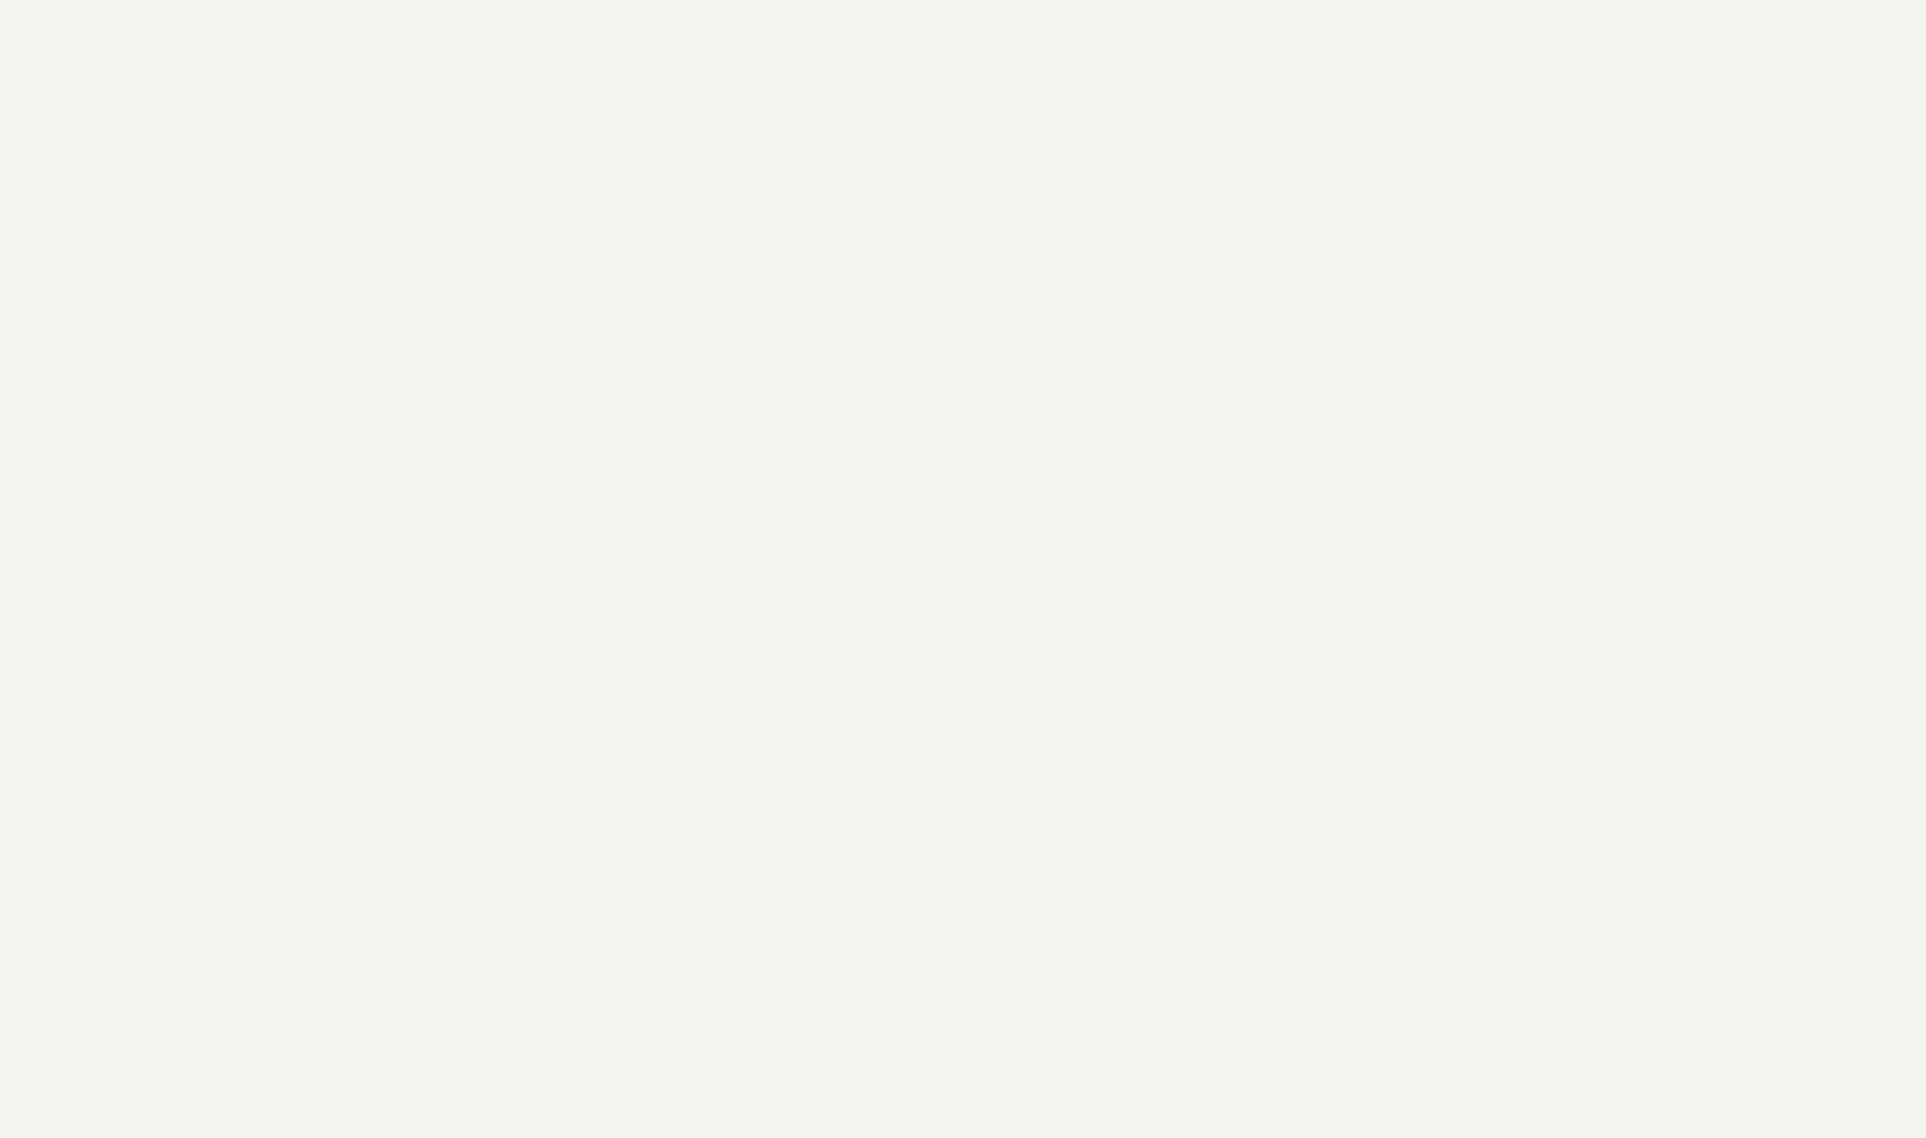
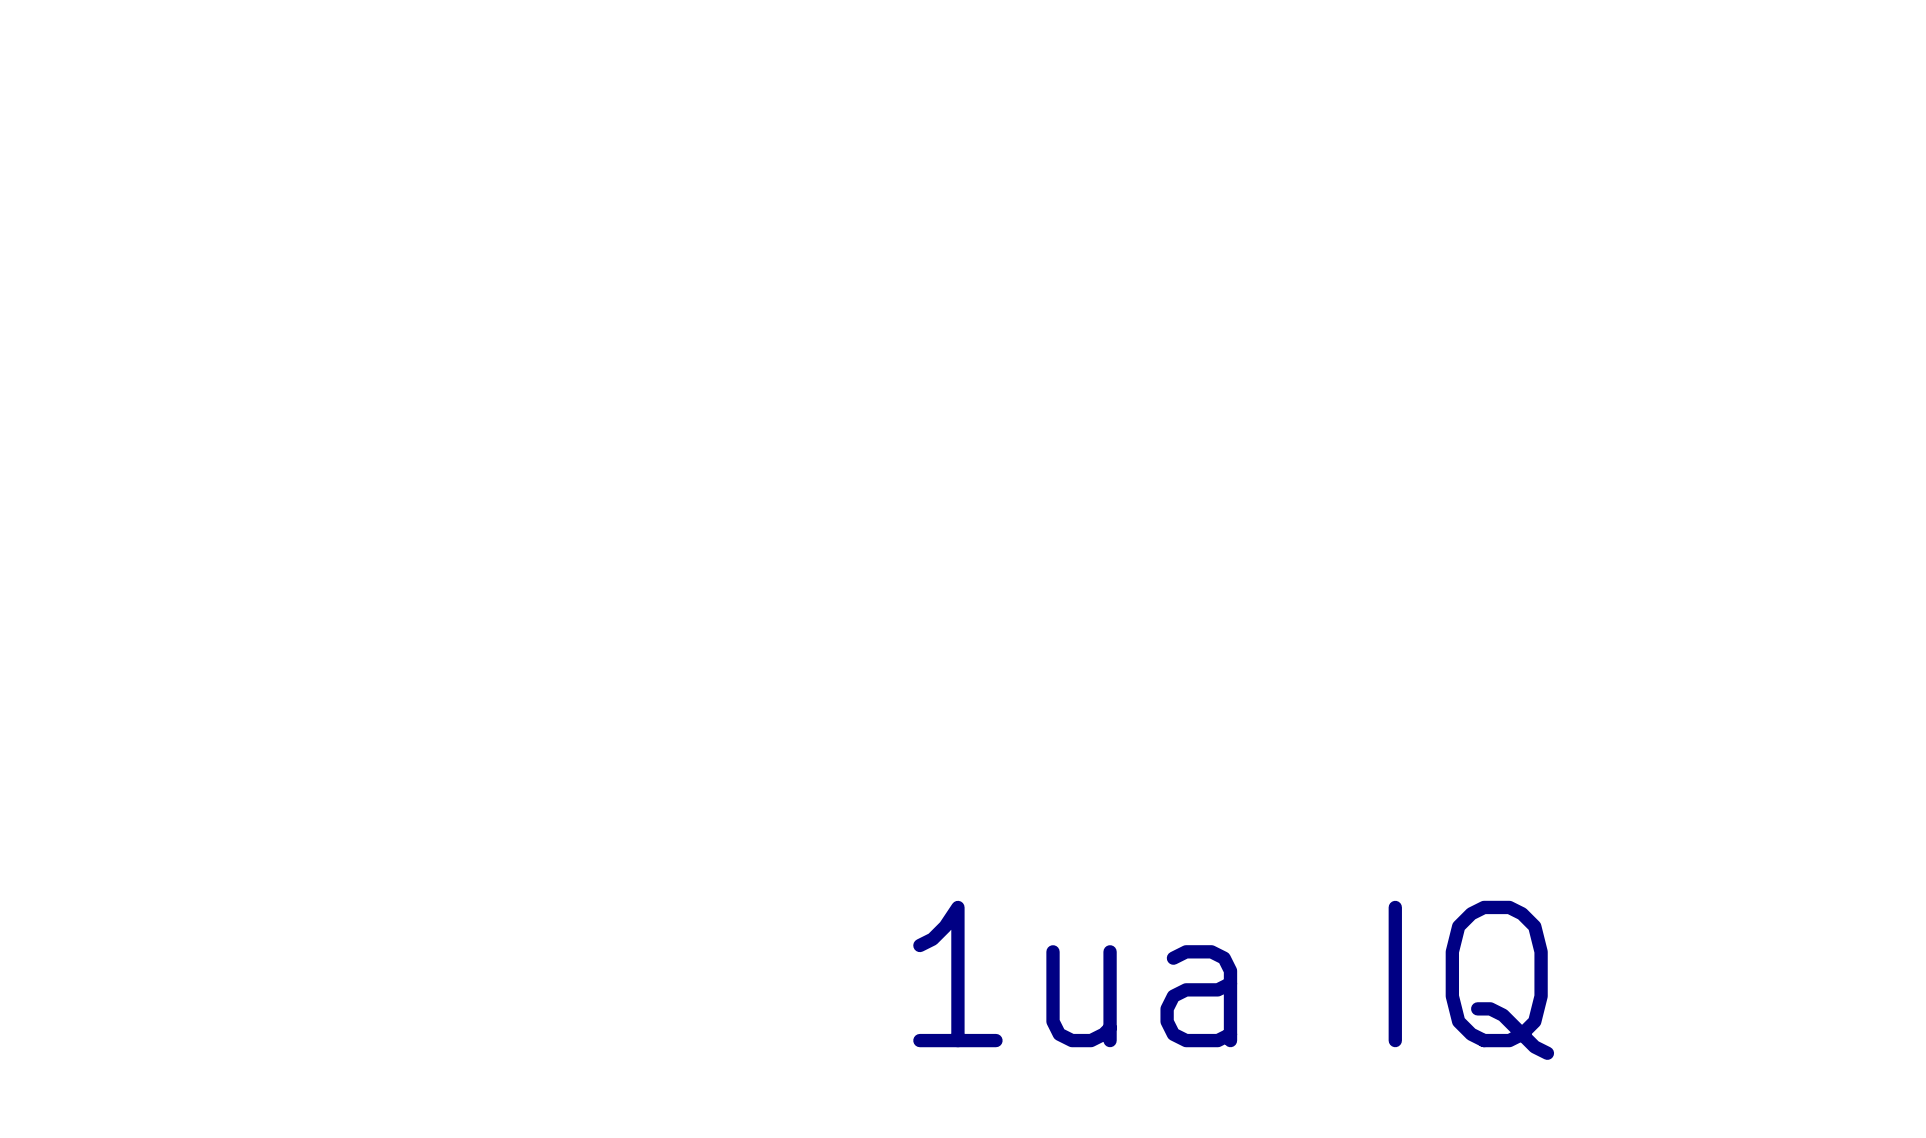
text: none -> 1ua IQ (1233, 980)

